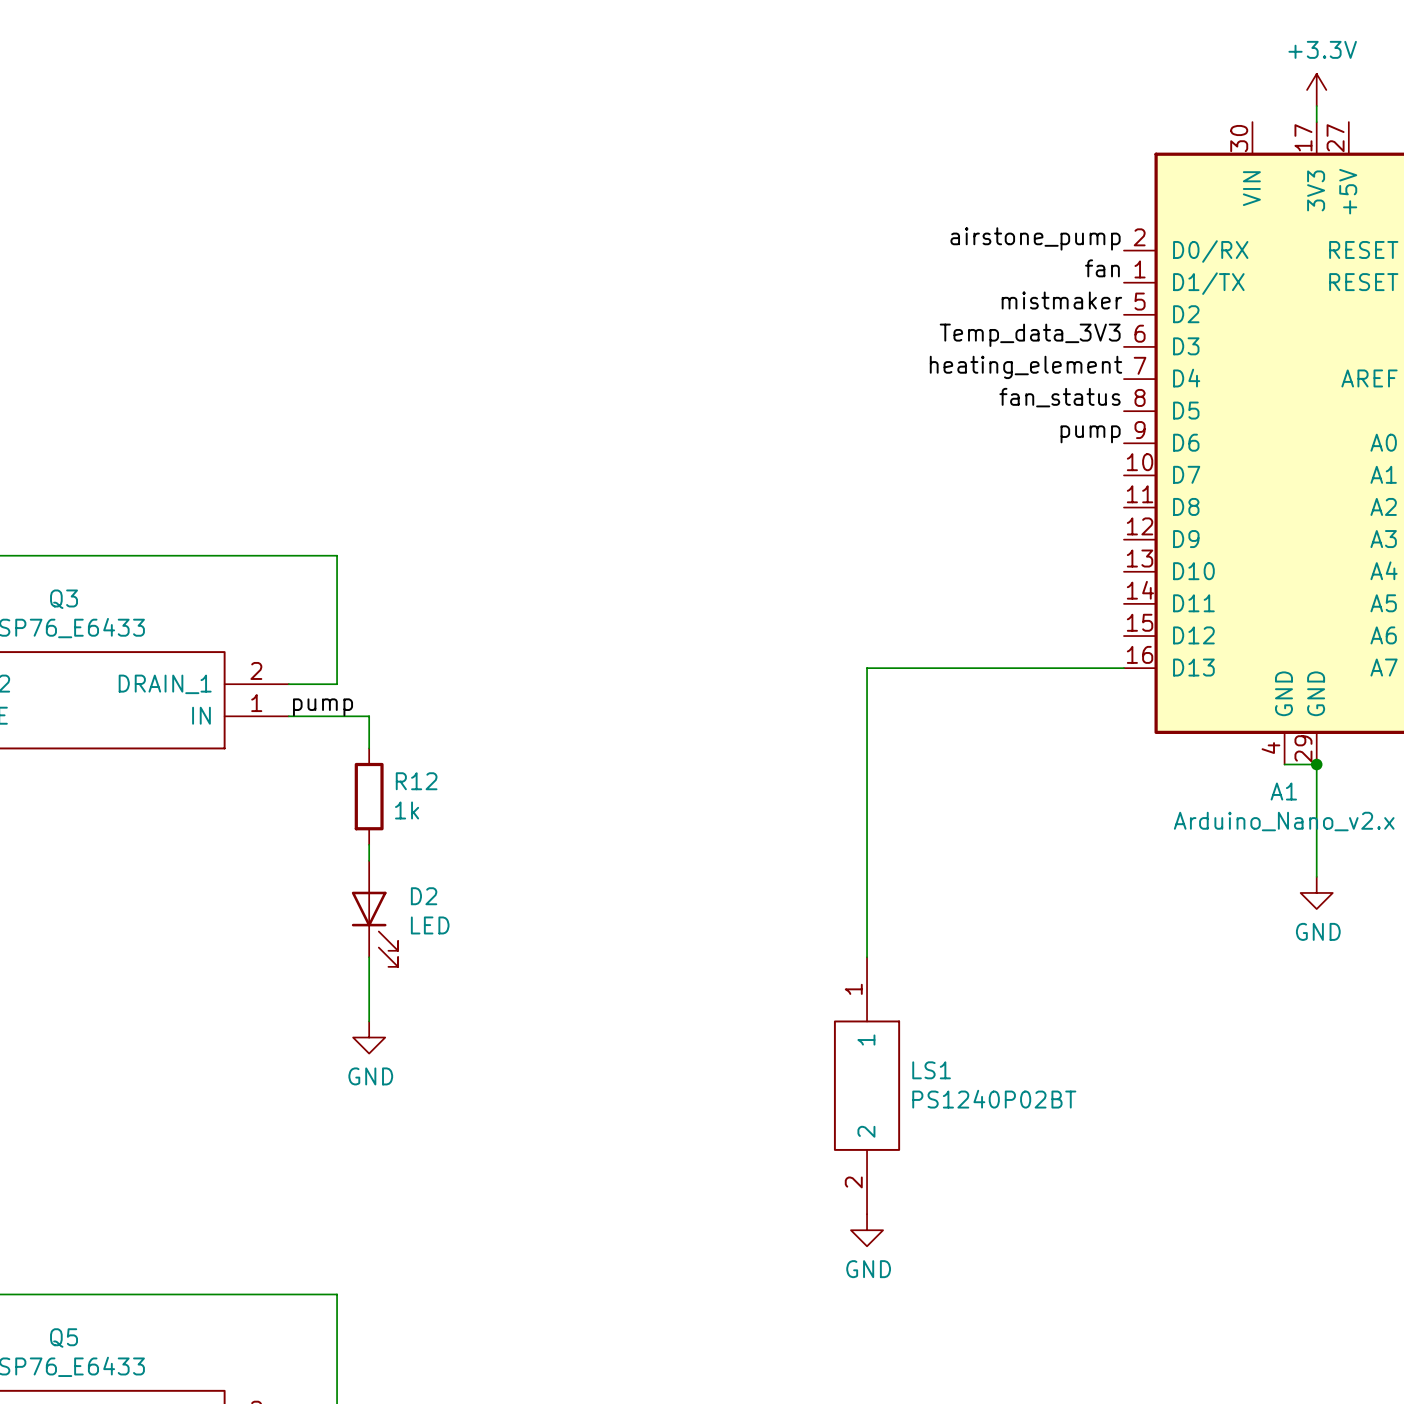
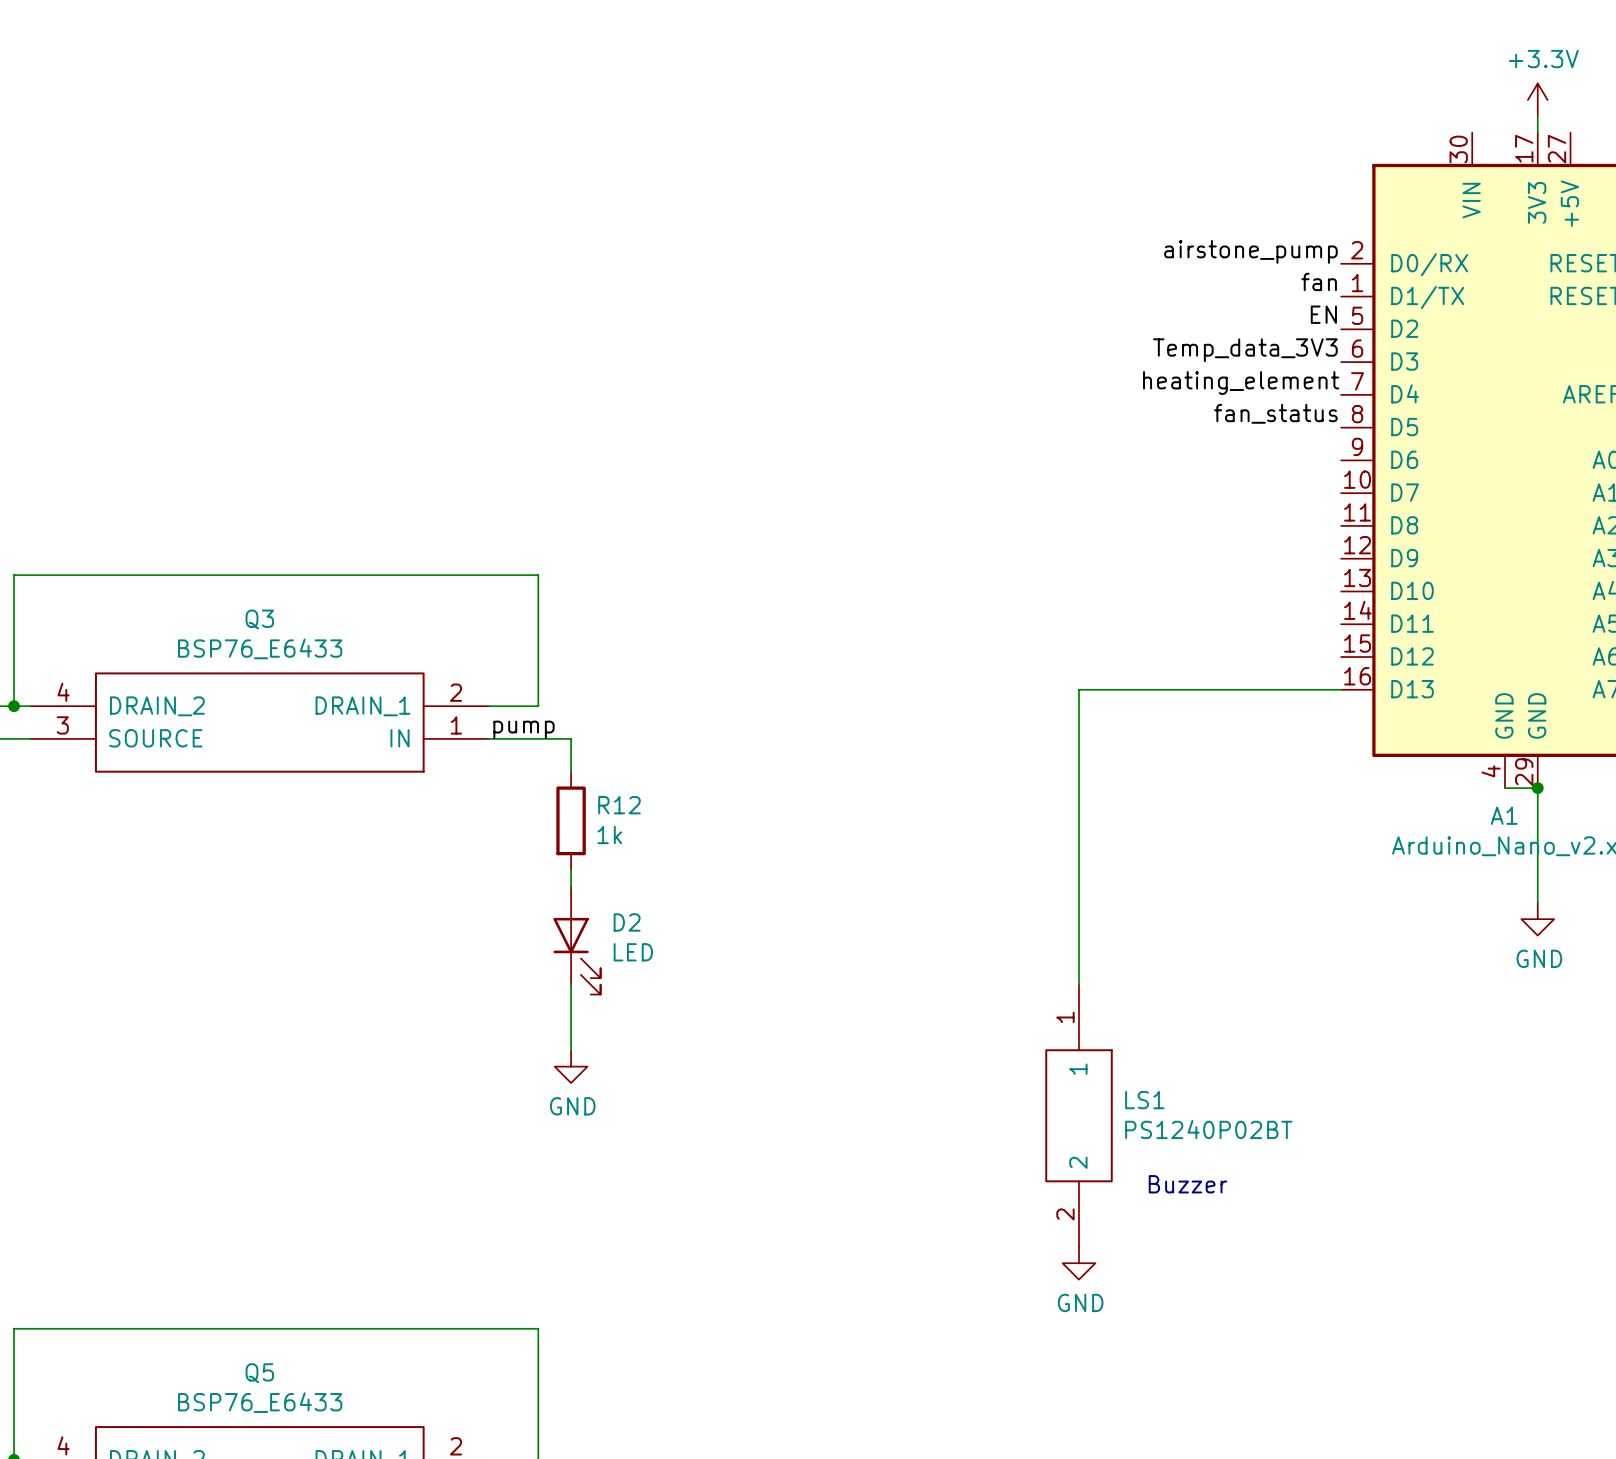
label: mistmaker (1061, 300) -> EN (1323, 314)
label: pump (1090, 434) -> none
text: none -> Buzzer (1187, 1184)

